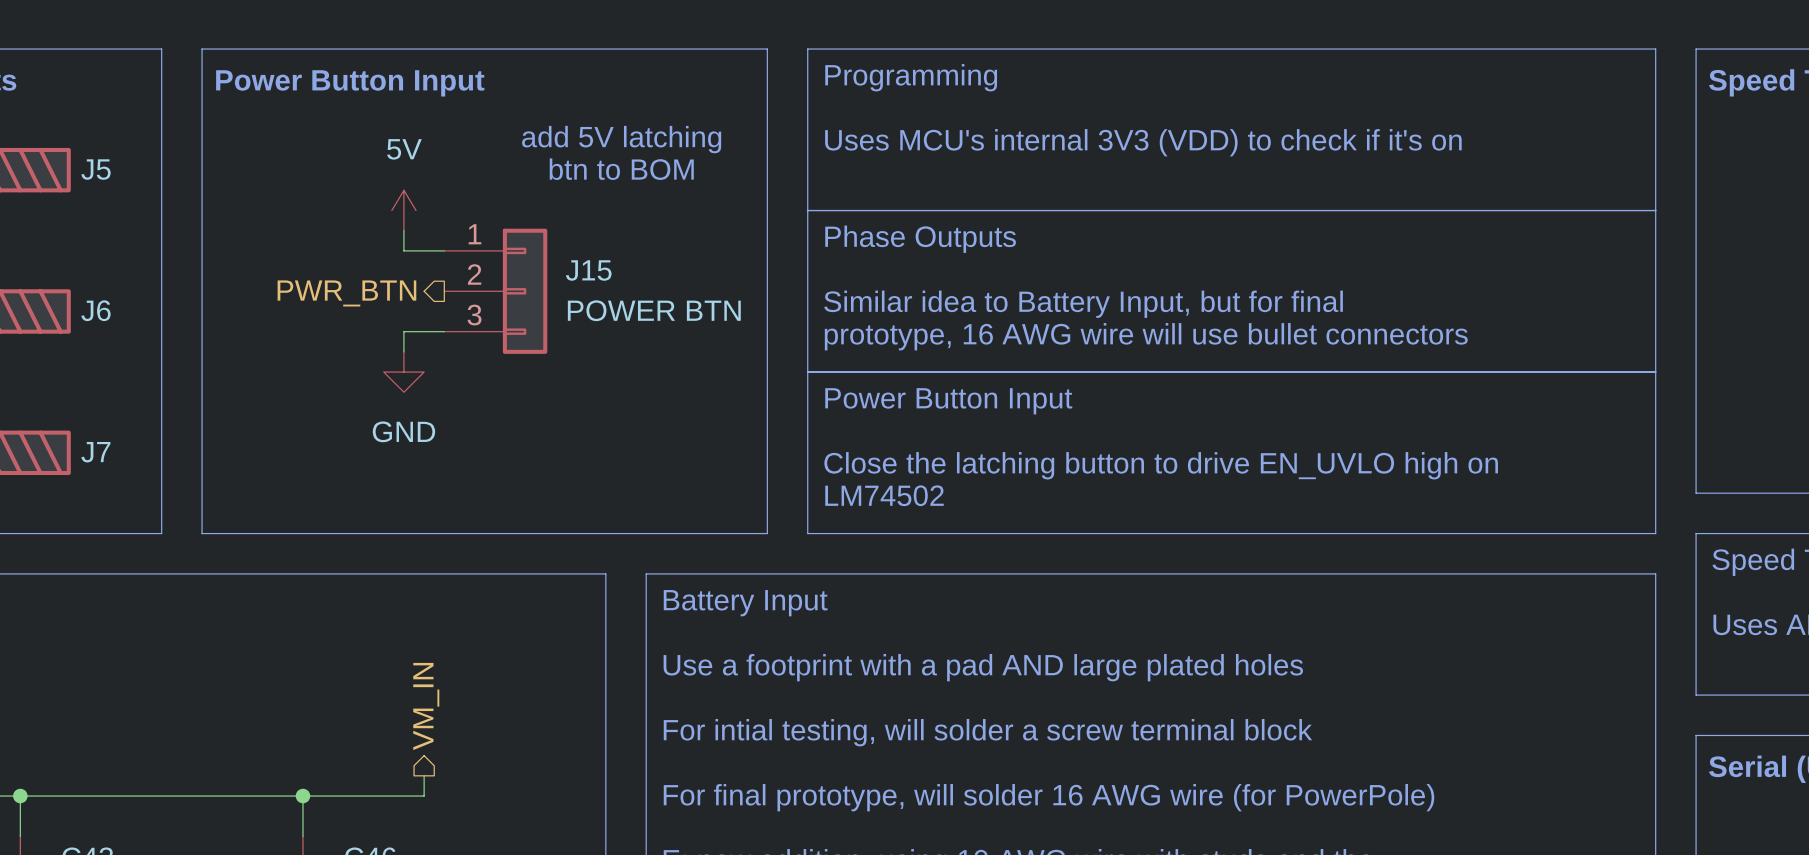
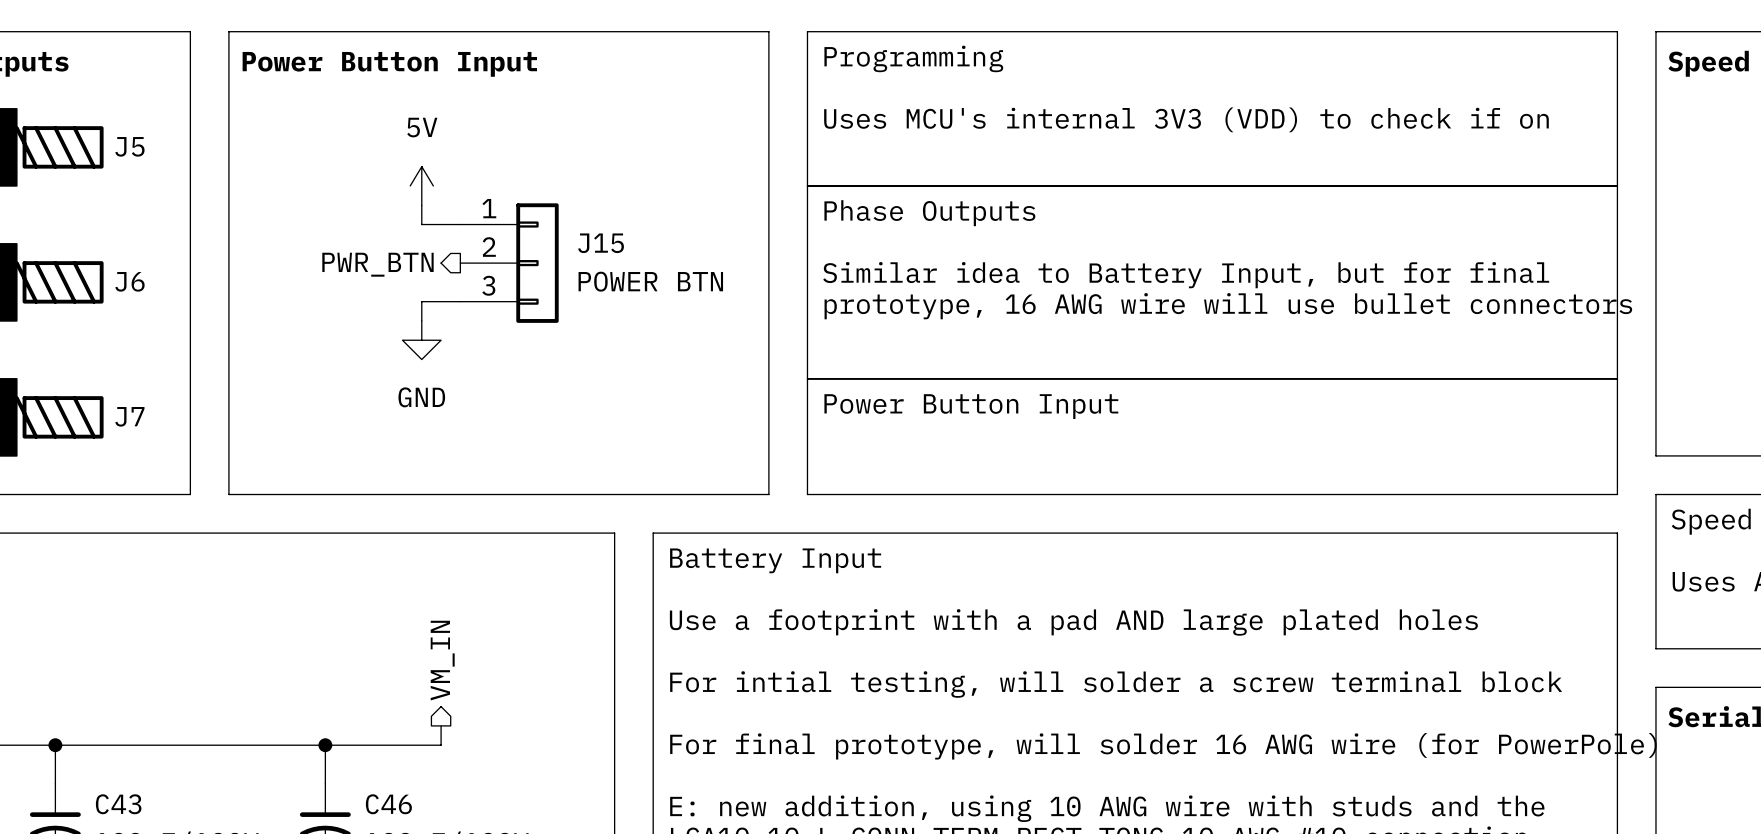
text: add 5V latching (621, 139) -> none
text: Uses MCU's internal 3V3 (VDD) to check if it's on (1143, 142) -> Uses MCU's internal 3V3 (VDD) to check if on (1186, 119)
text: btn to BOM (621, 169) -> none
line: (807, 372) (1655, 372) -> (807, 378) (1617, 378)
text position: Power Button Input (948, 401) -> Power Button Input (971, 406)
text: Close the latching button to drive EN_UVLO high on (1161, 465) -> none
text: LM74502 (884, 495) -> none

